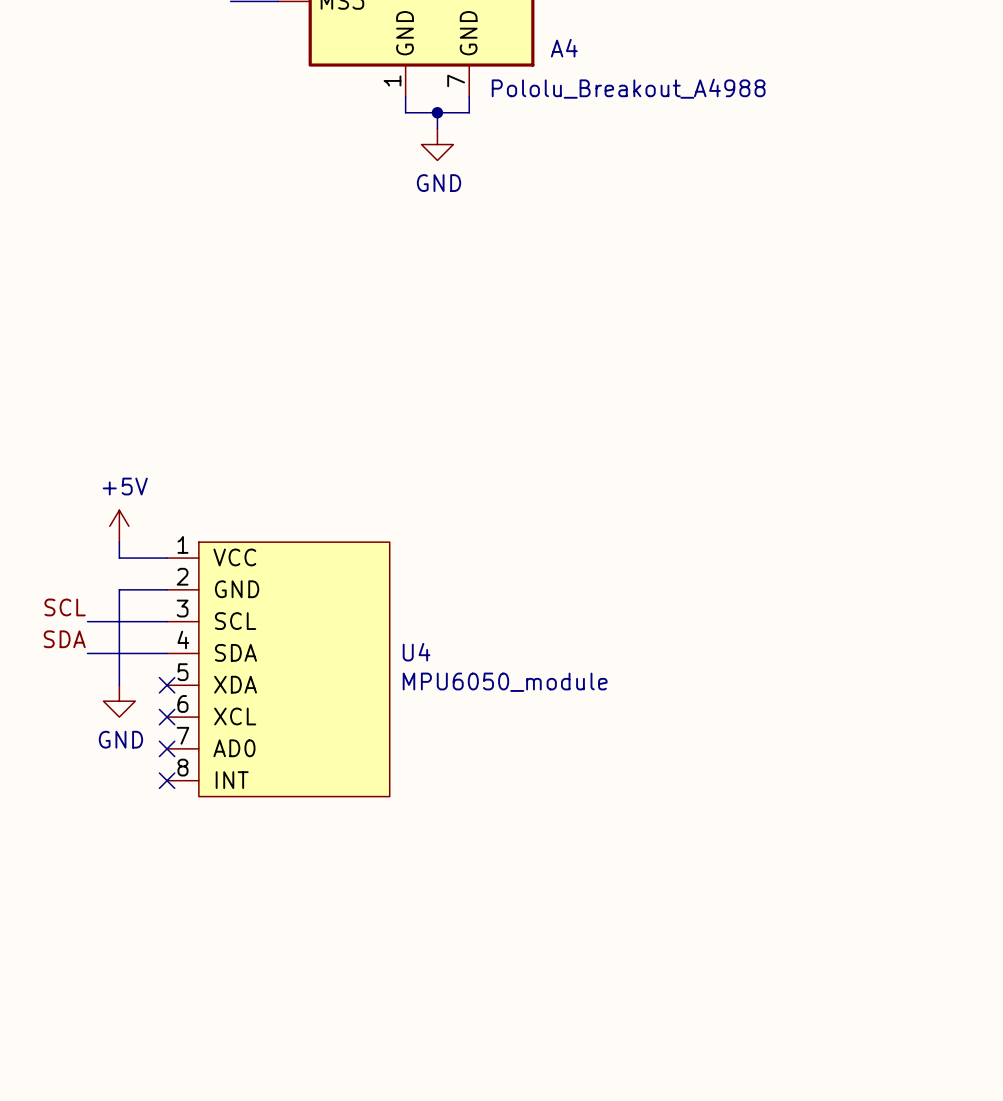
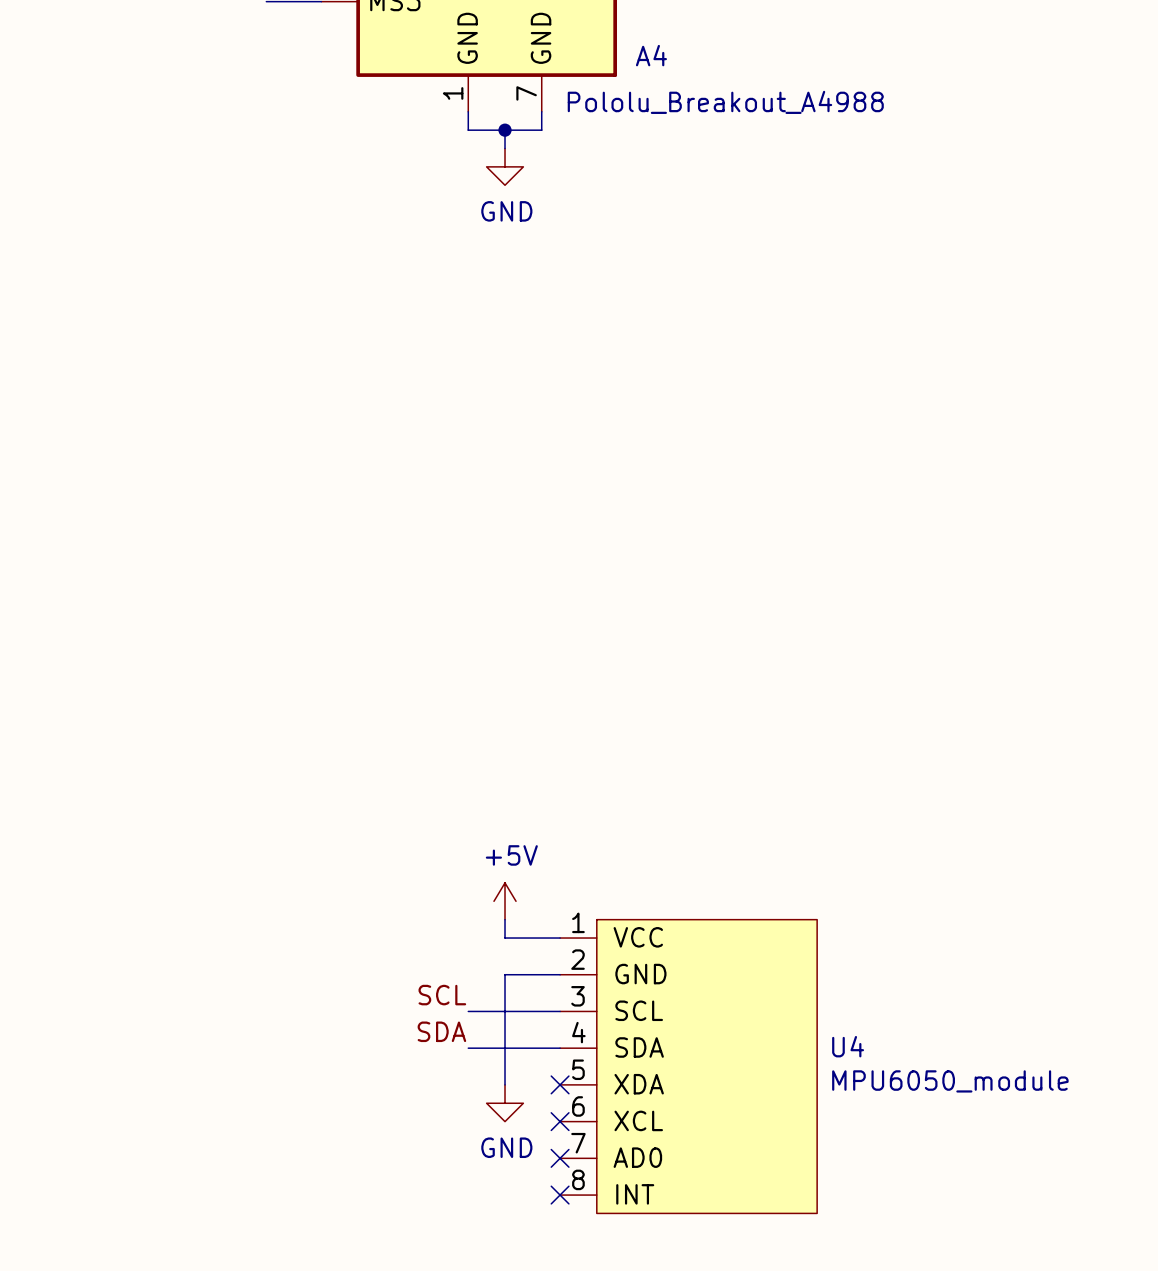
power symbol: +5V (119, 526) -> none
wire: (119, 542) (119, 558) (167, 558) -> none
wire: (167, 589) (119, 589) (119, 685) -> none
label: SCL (65, 607) -> none
wire: (87, 621) (167, 621) -> none
label: SDA (64, 639) -> none
wire: (87, 653) (167, 653) -> none
U4 position: (278, 669) -> (688, 1066)
no-connect mark: (167, 685) -> none
power symbol: GND (119, 701) -> none
no-connect mark: (167, 717) -> none
no-connect mark: (167, 748) -> none
no-connect mark: (167, 780) -> none
power symbol: none -> +5V (505, 901)
wire: none -> (505, 919) (505, 938) (560, 938)
wire: none -> (560, 974) (505, 974) (505, 1084)
label: none -> SCL (442, 995)
wire: none -> (468, 1011) (560, 1011)
label: none -> SDA (441, 1031)
wire: none -> (468, 1048) (560, 1048)
no-connect mark: none -> (560, 1084)
power symbol: none -> GND (505, 1103)
no-connect mark: none -> (560, 1121)
no-connect mark: none -> (560, 1158)
no-connect mark: none -> (560, 1195)

